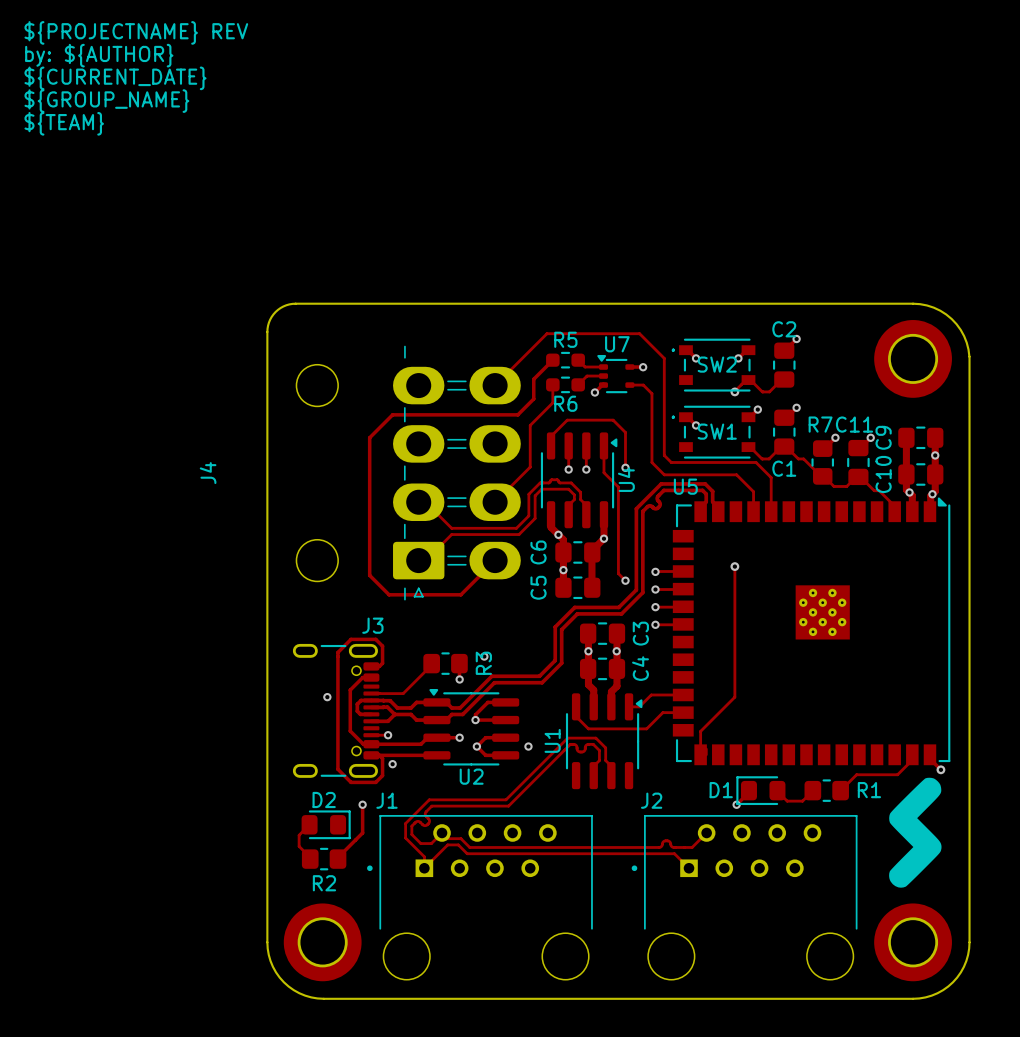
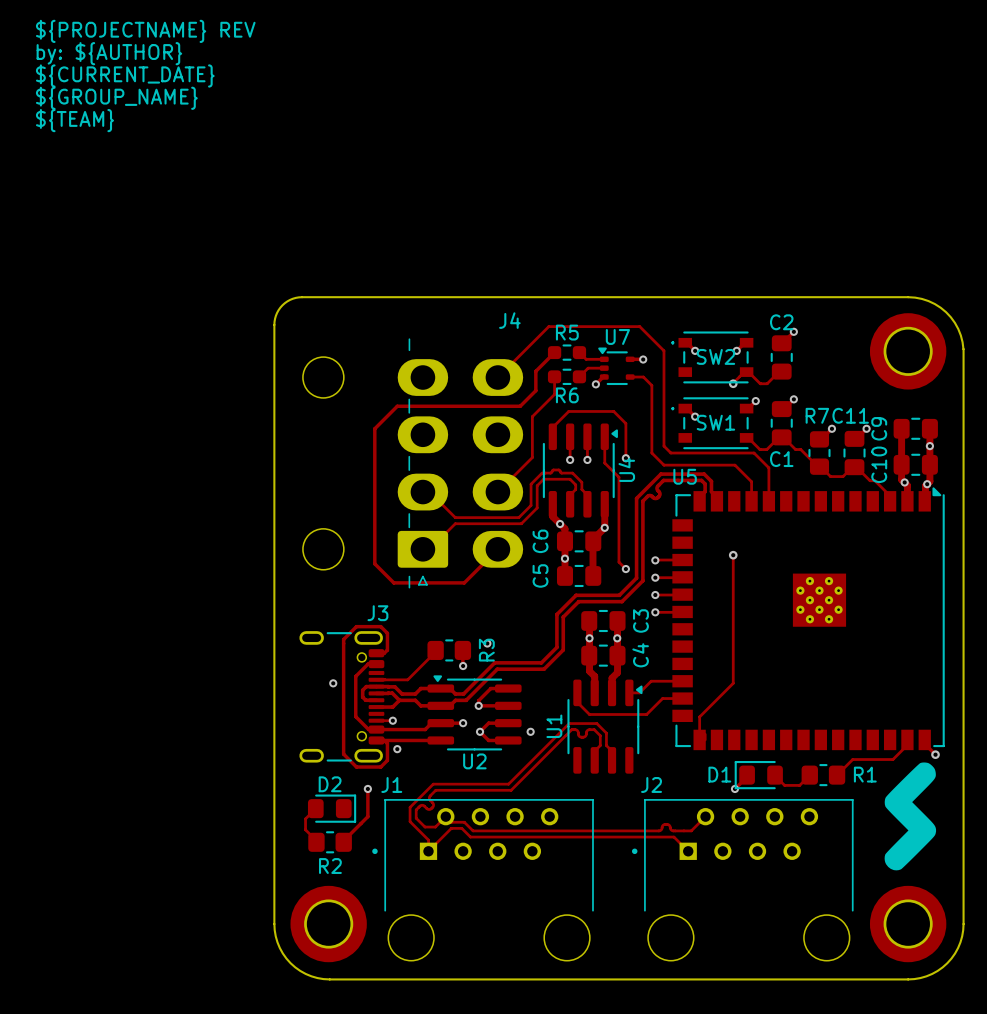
J4 footprint: [296, 345, 521, 601] -> [302, 338, 524, 589]
J4 name position: J4 (208, 473) -> J4 (509, 320)

